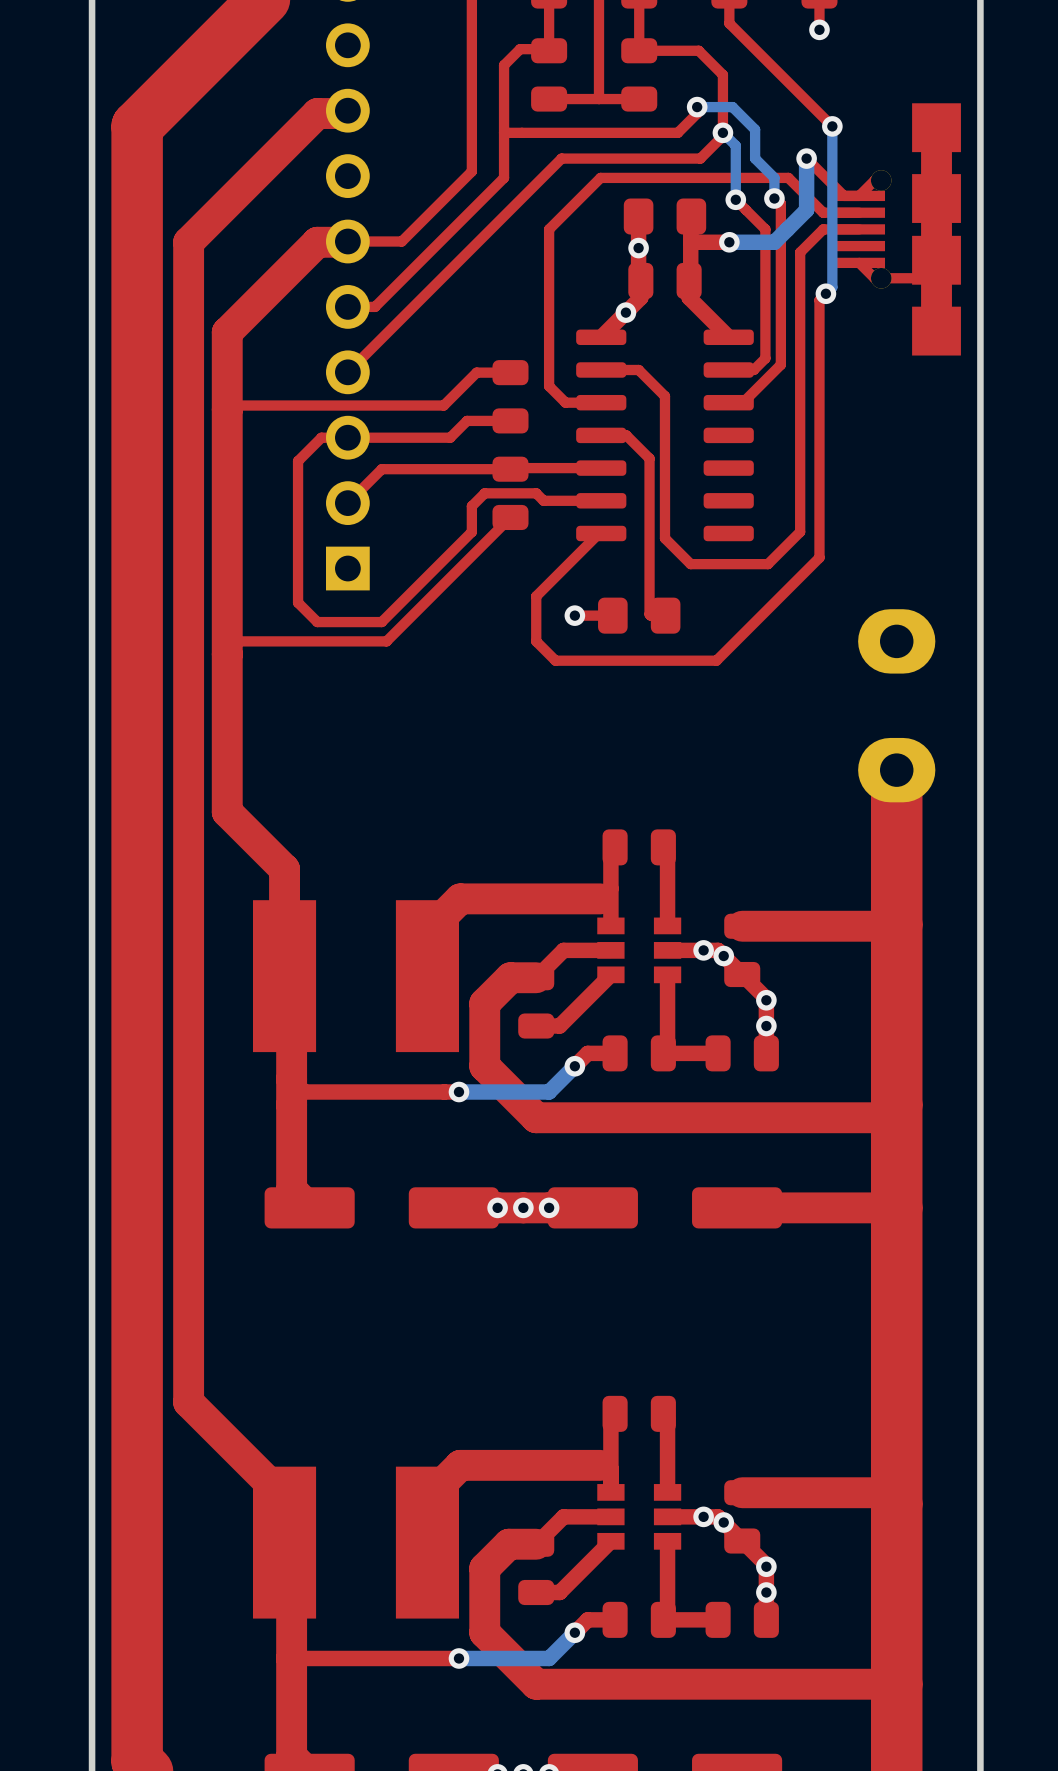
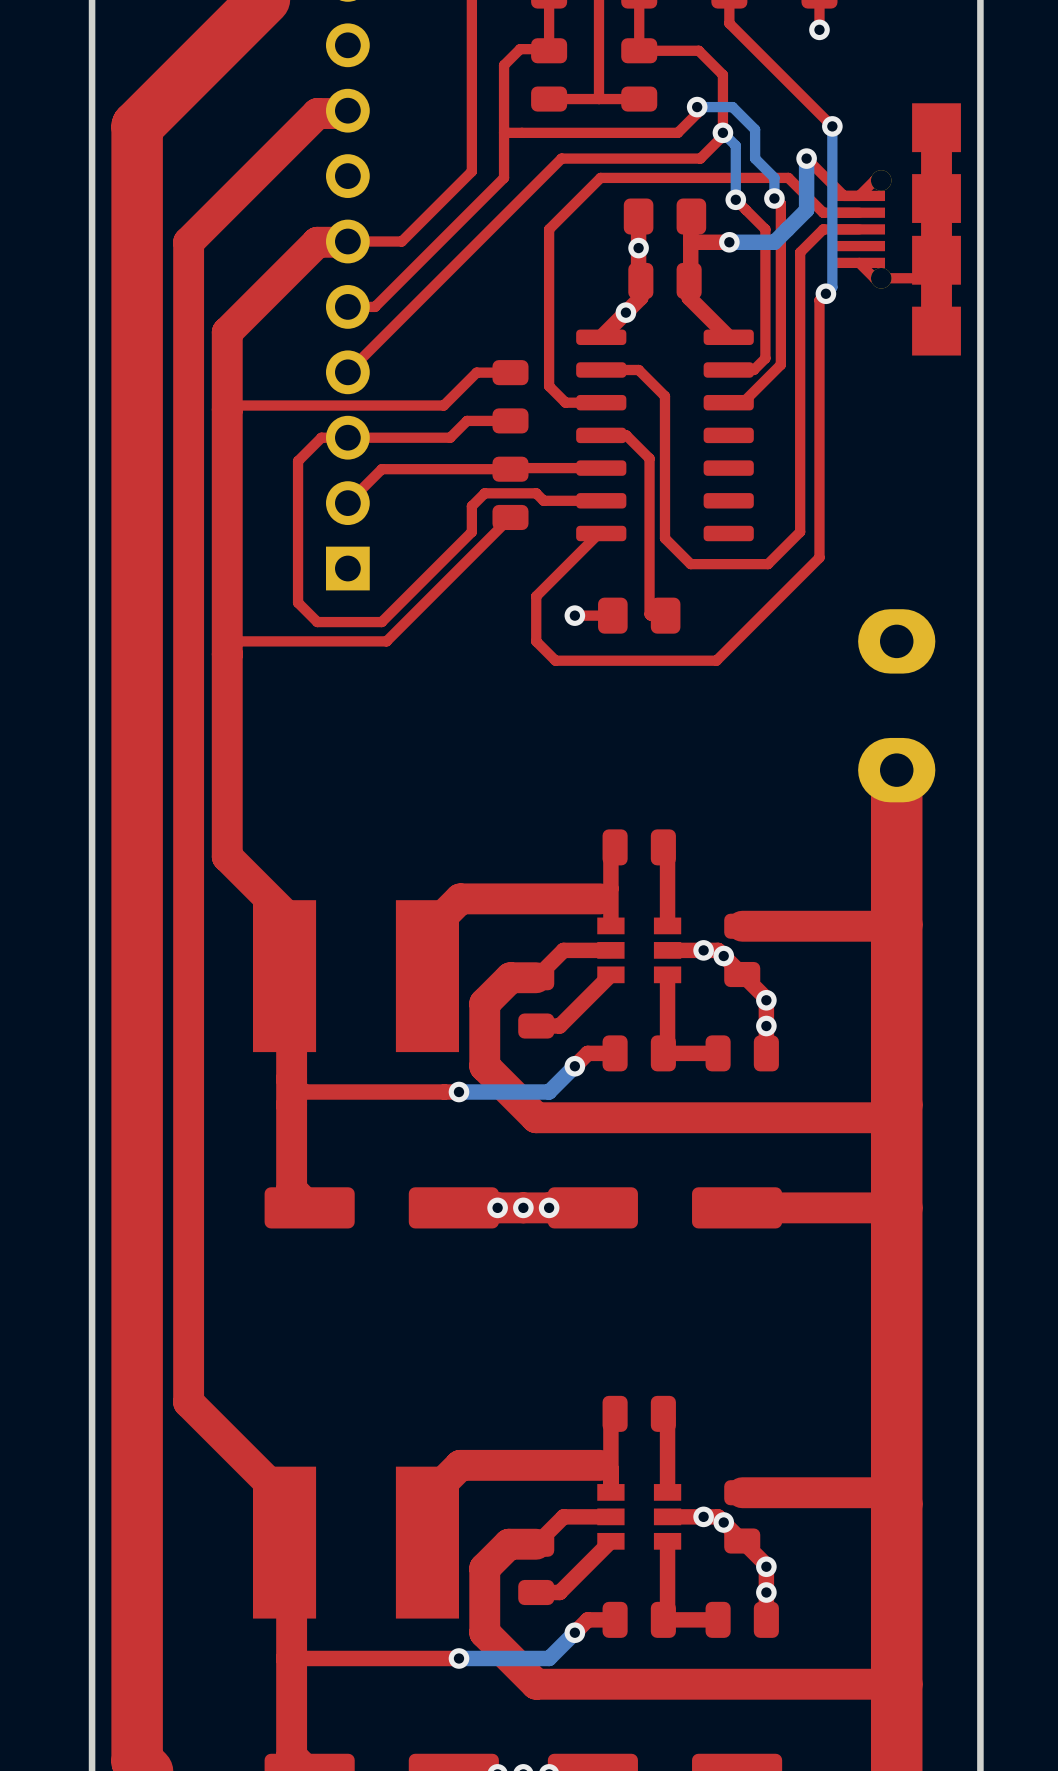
top track: (227, 811) (284, 869) (284, 913) -> (227, 811) (227, 856) (284, 913)

